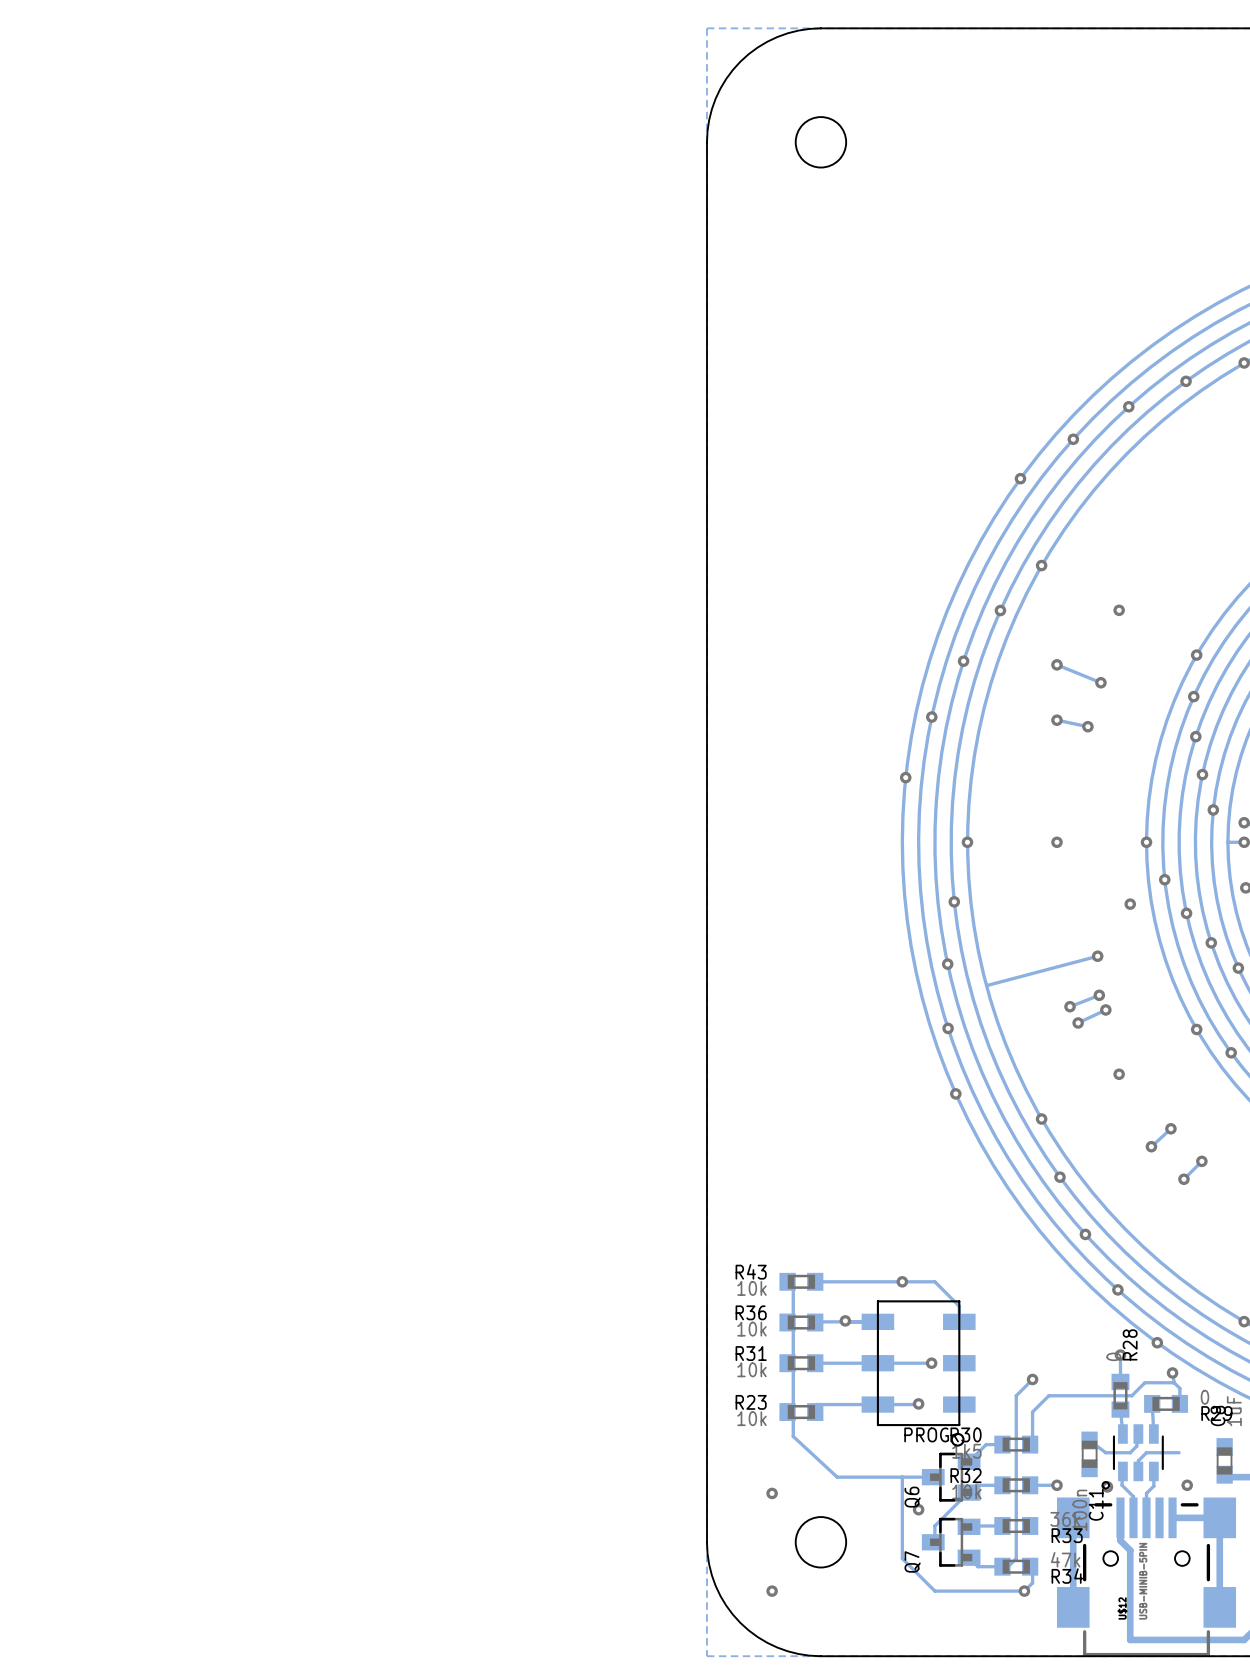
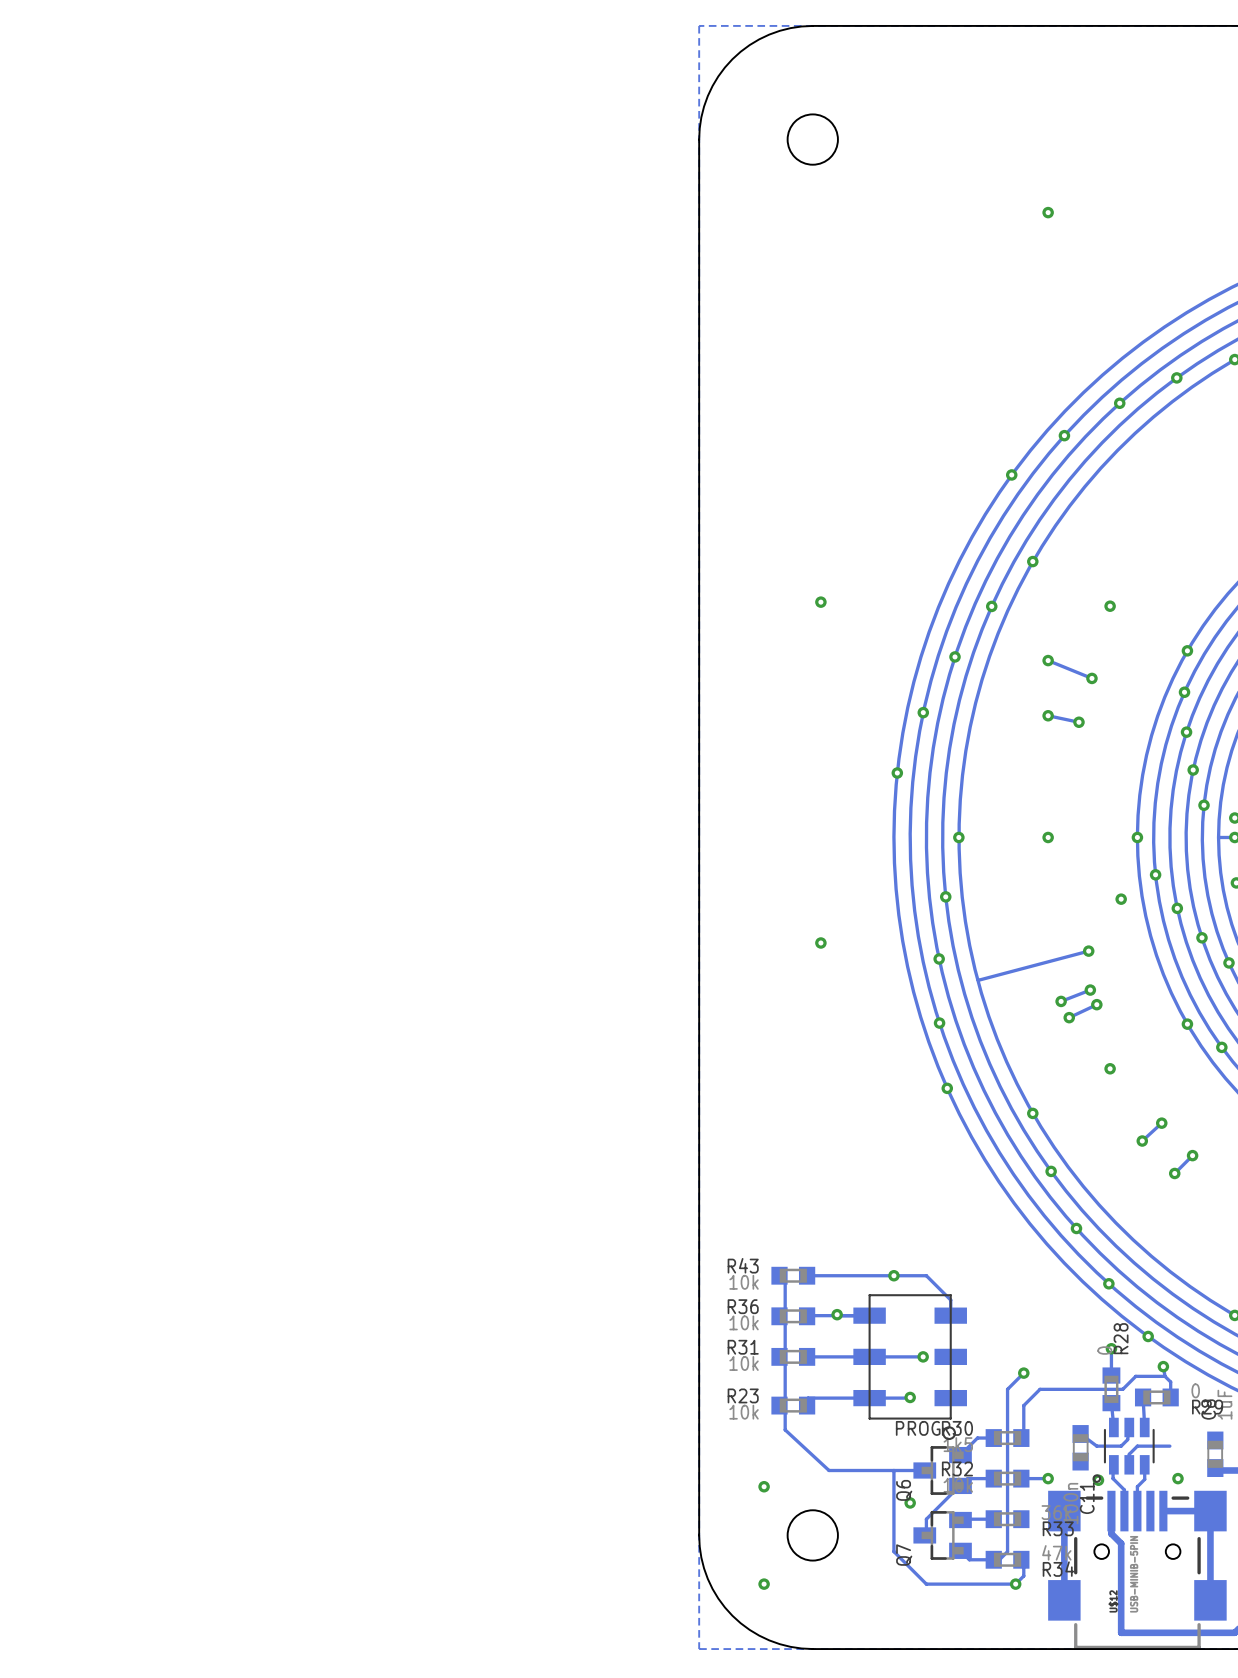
via: none -> (1048, 212)
via: none -> (820, 602)
via: none -> (820, 942)

